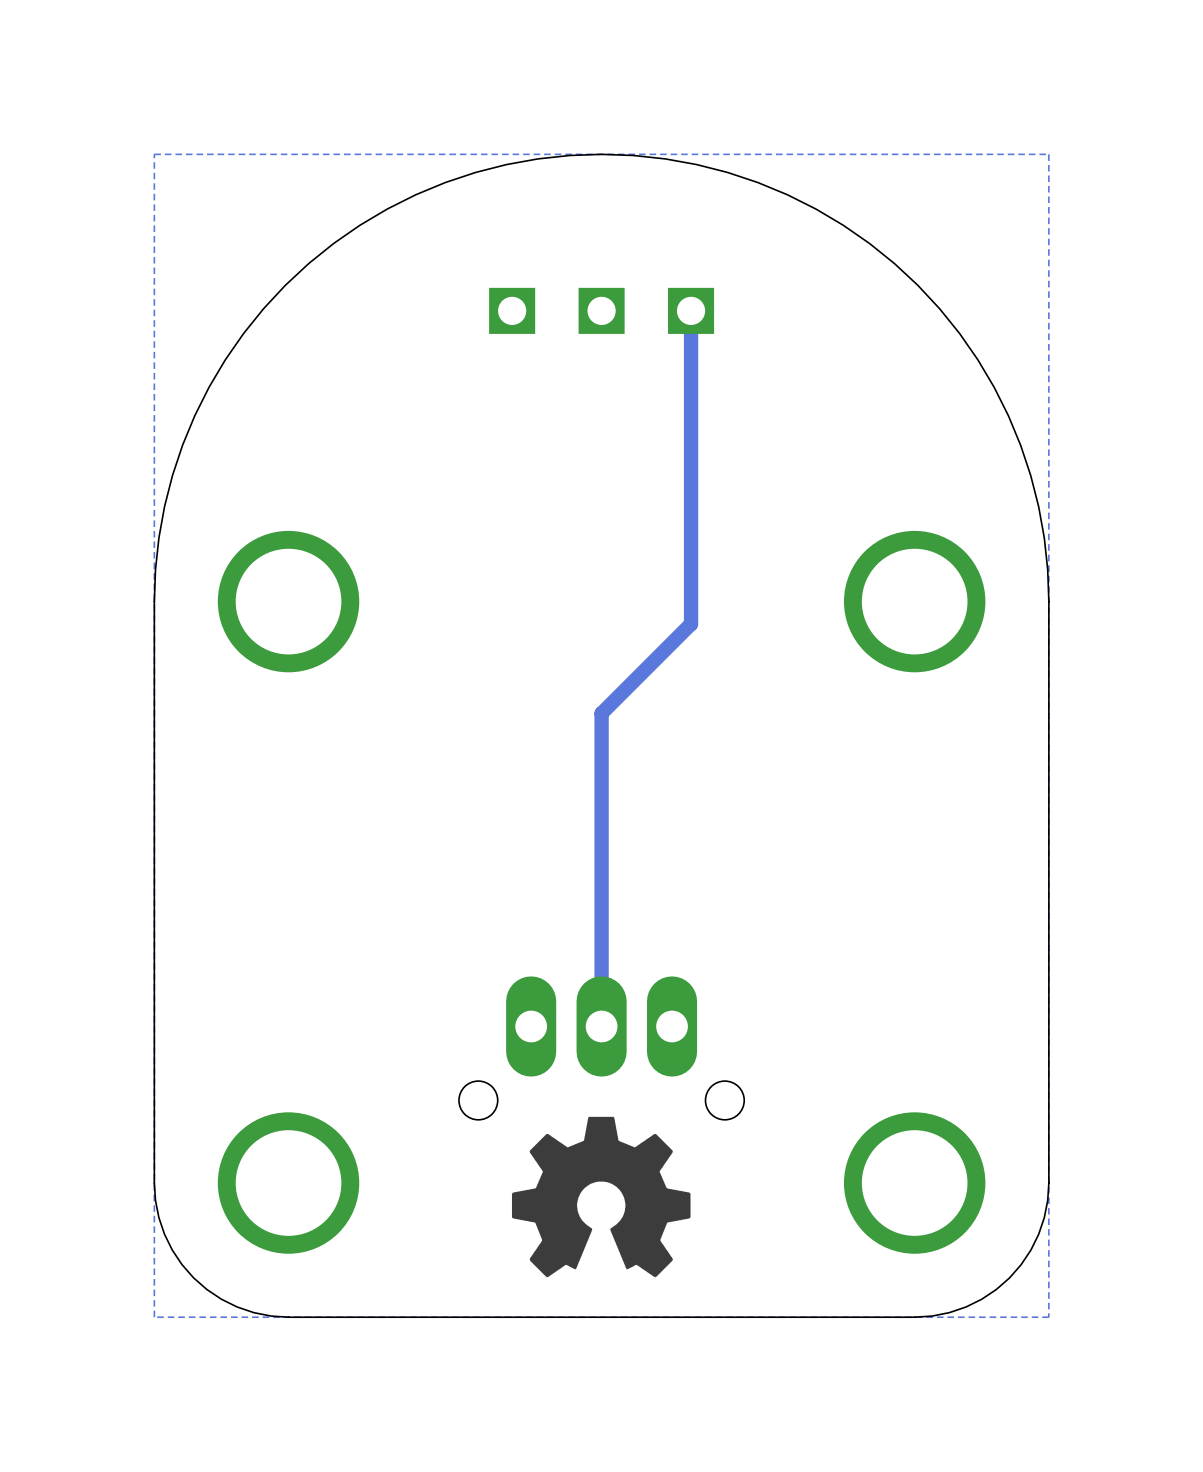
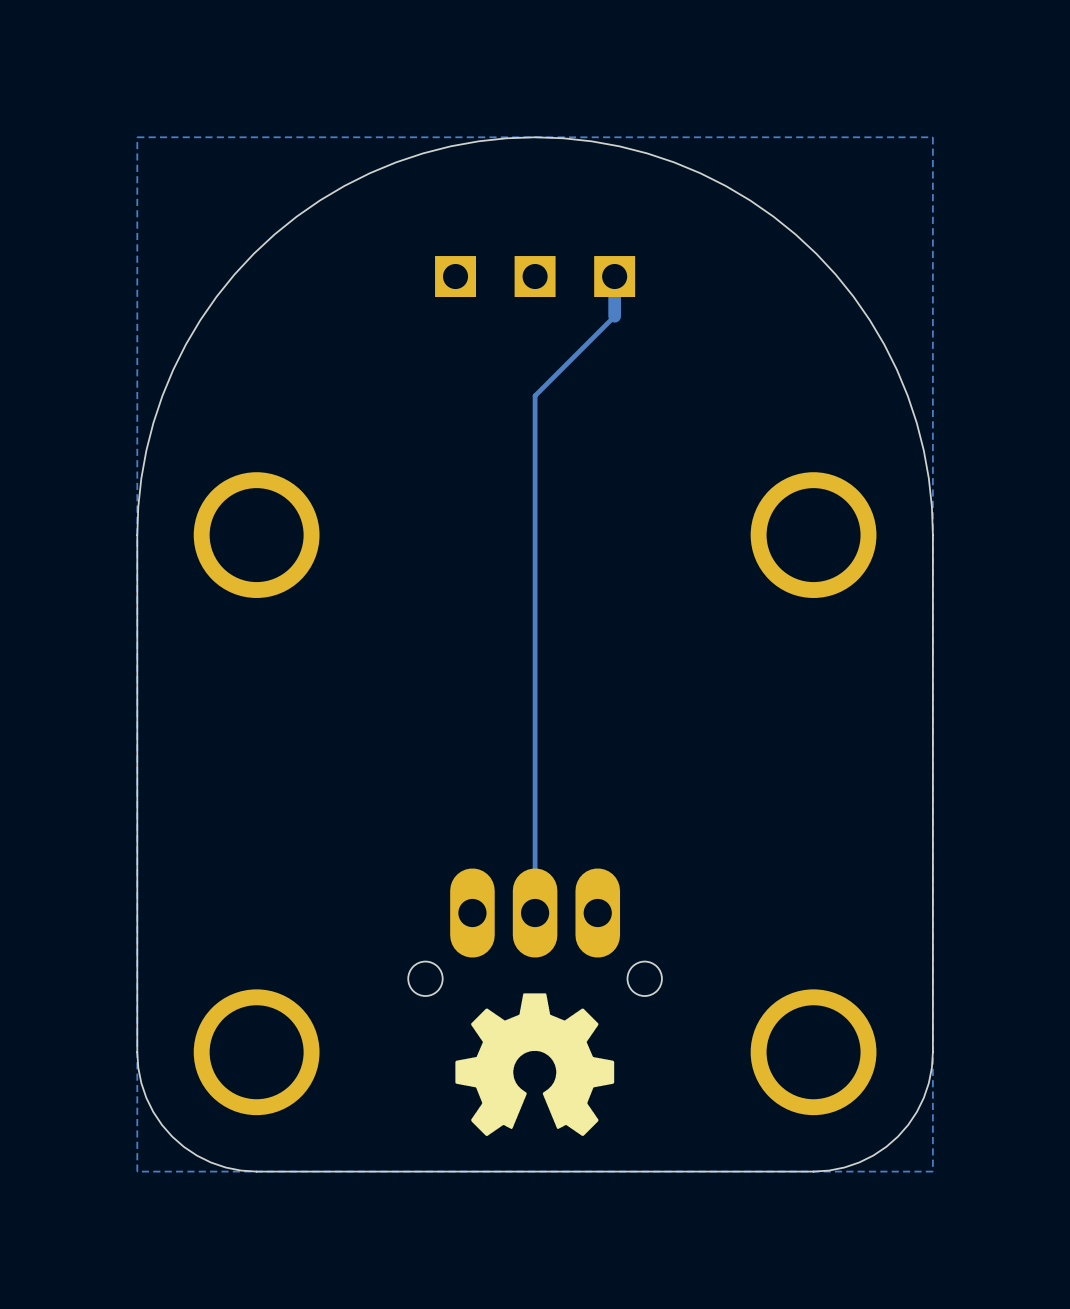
track: (691, 355) (691, 623) (601, 713) -> (614, 316) (535, 395) (535, 634)
track width: thick (601, 713) (601, 1026) -> thin (535, 634) (535, 913)

